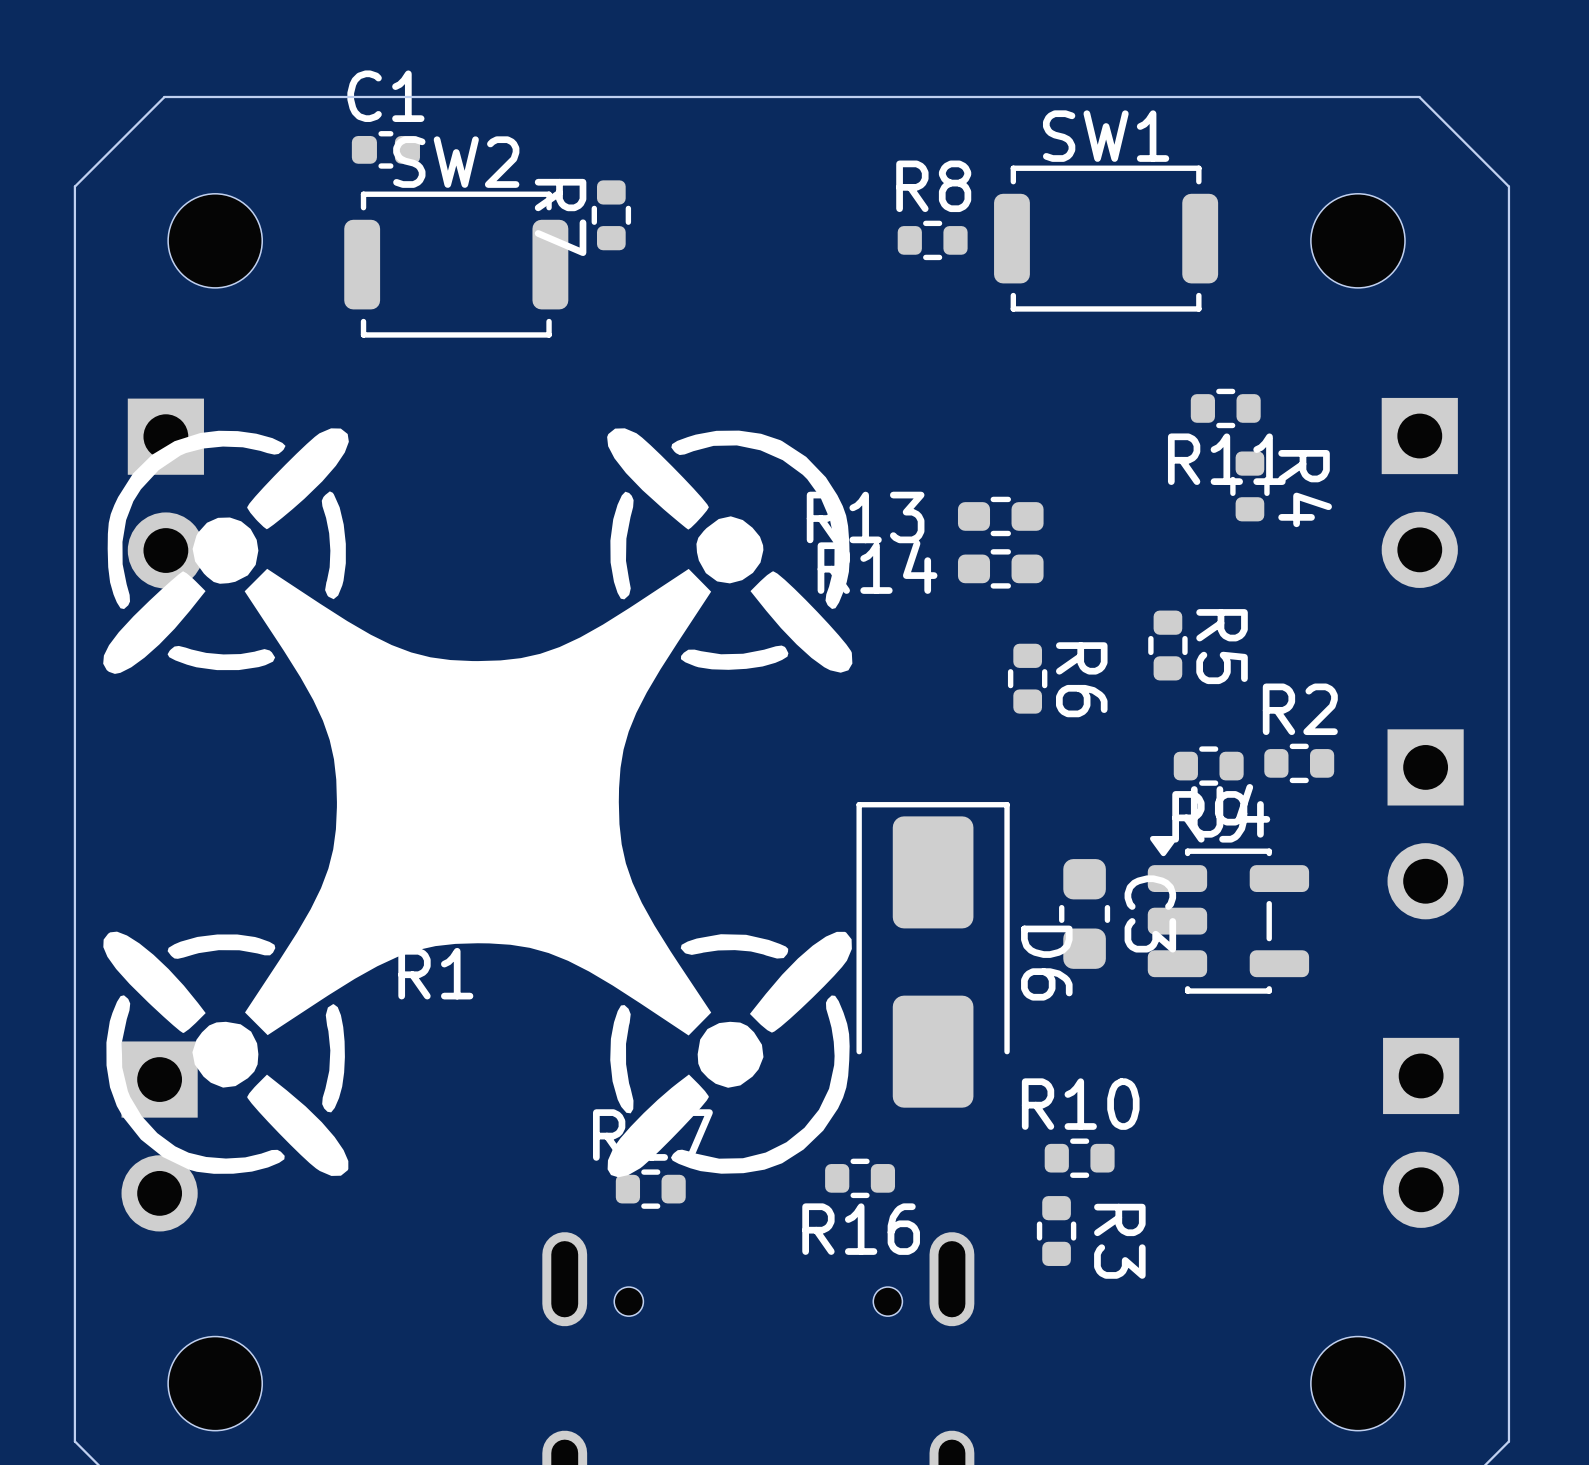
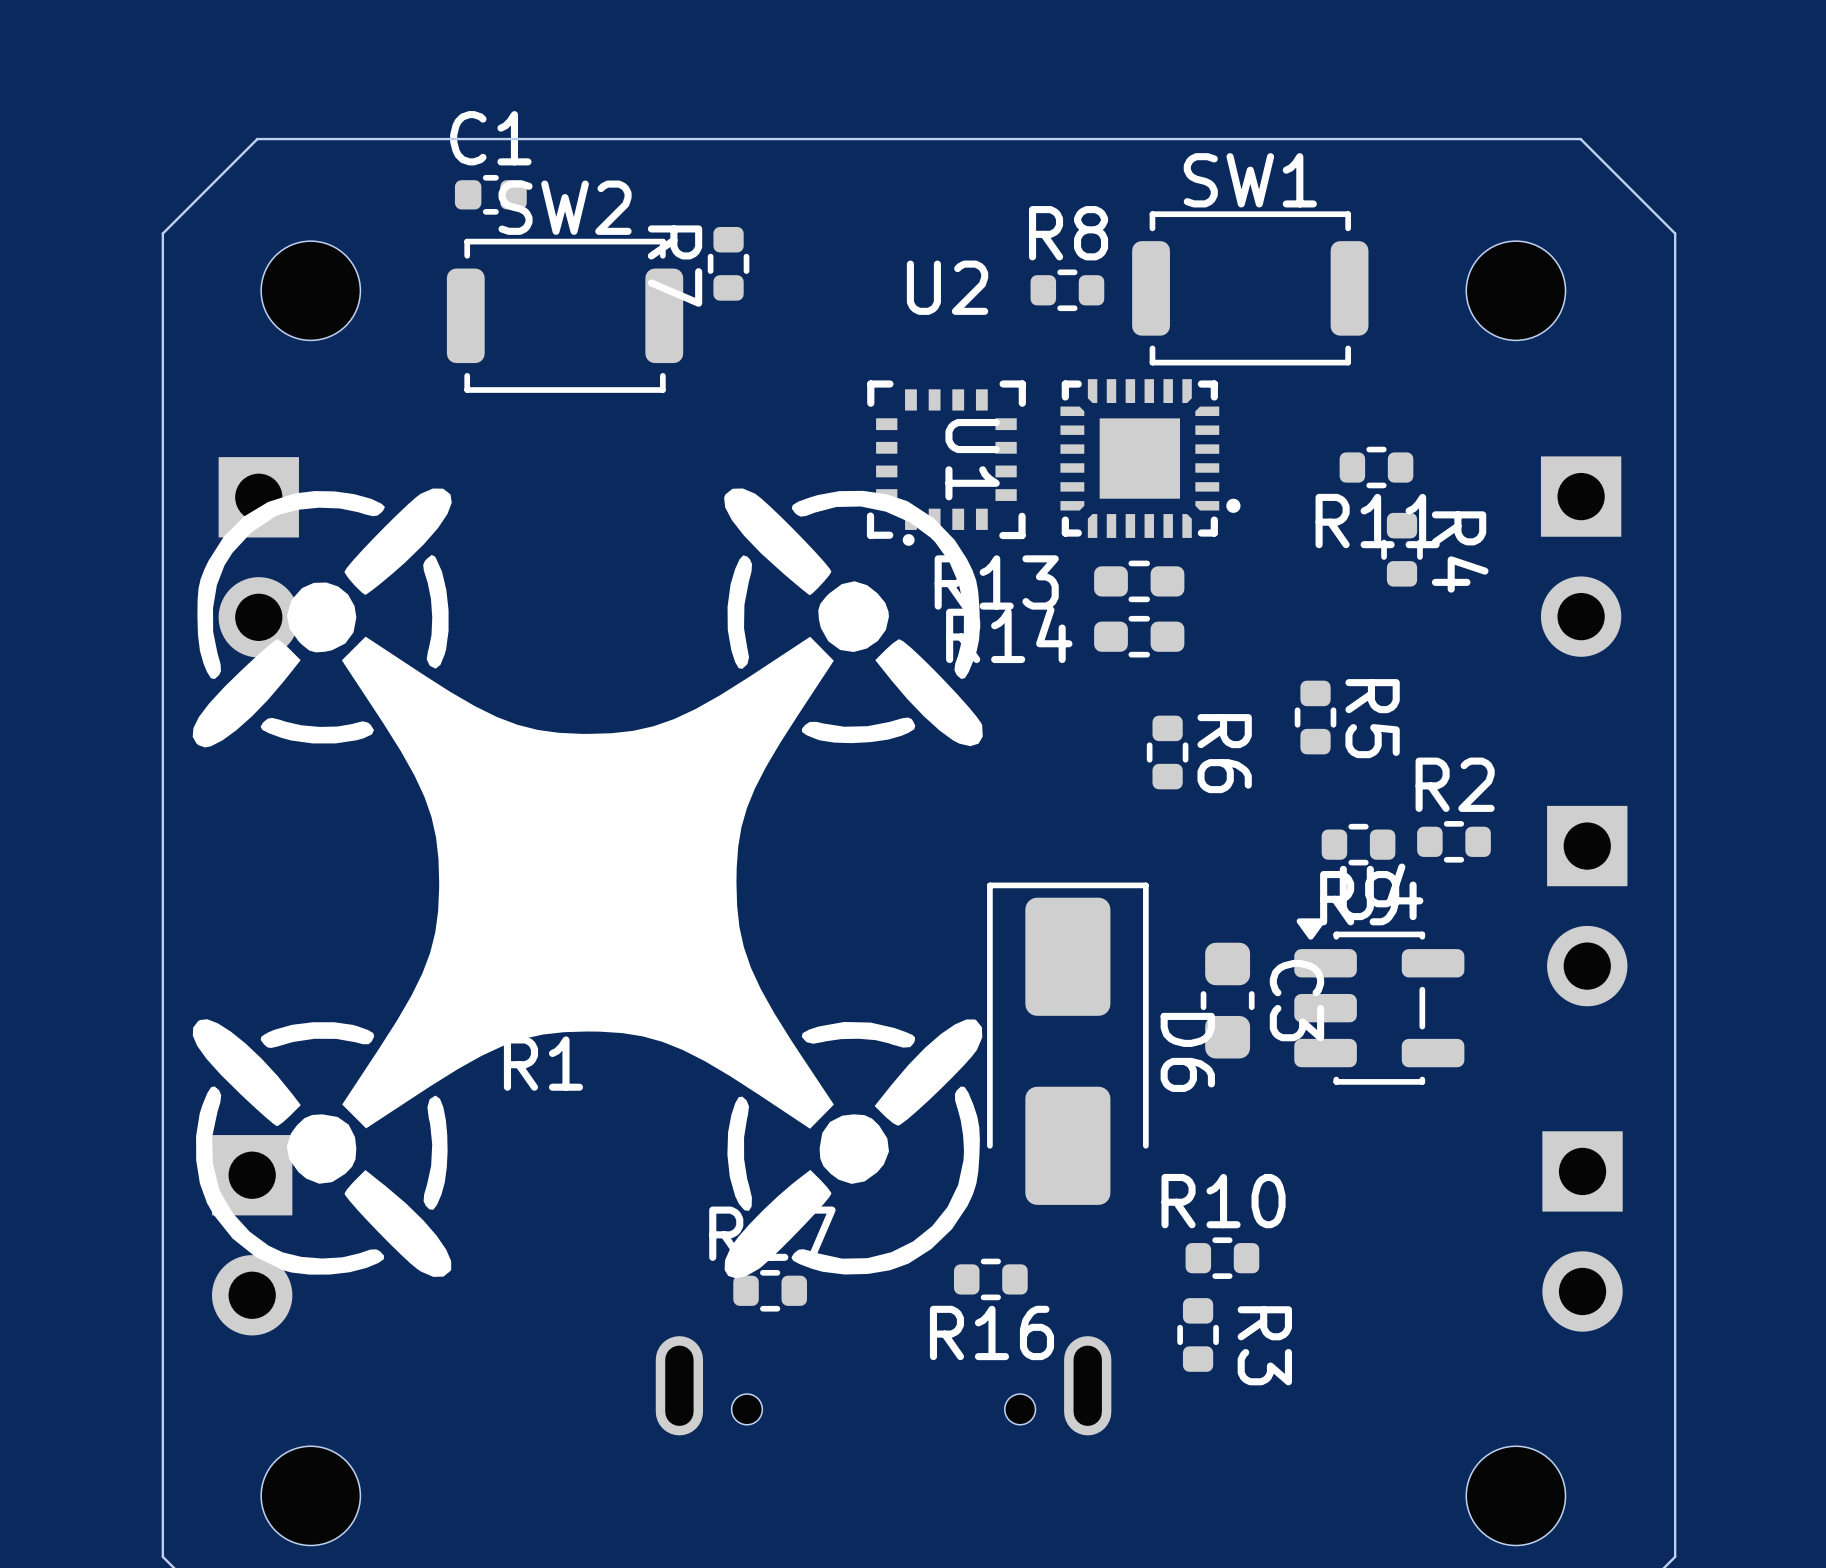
U1: none -> (1150, 458)
U2: none -> (946, 463)

